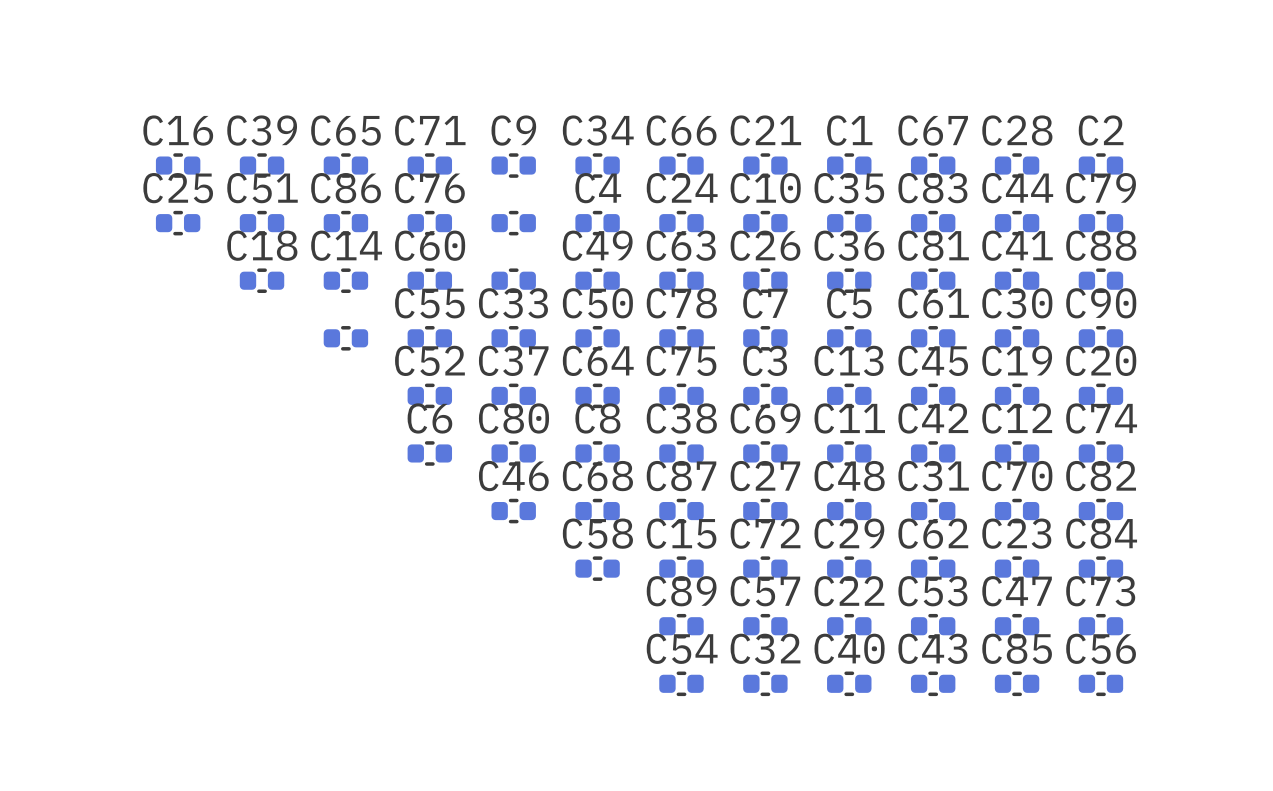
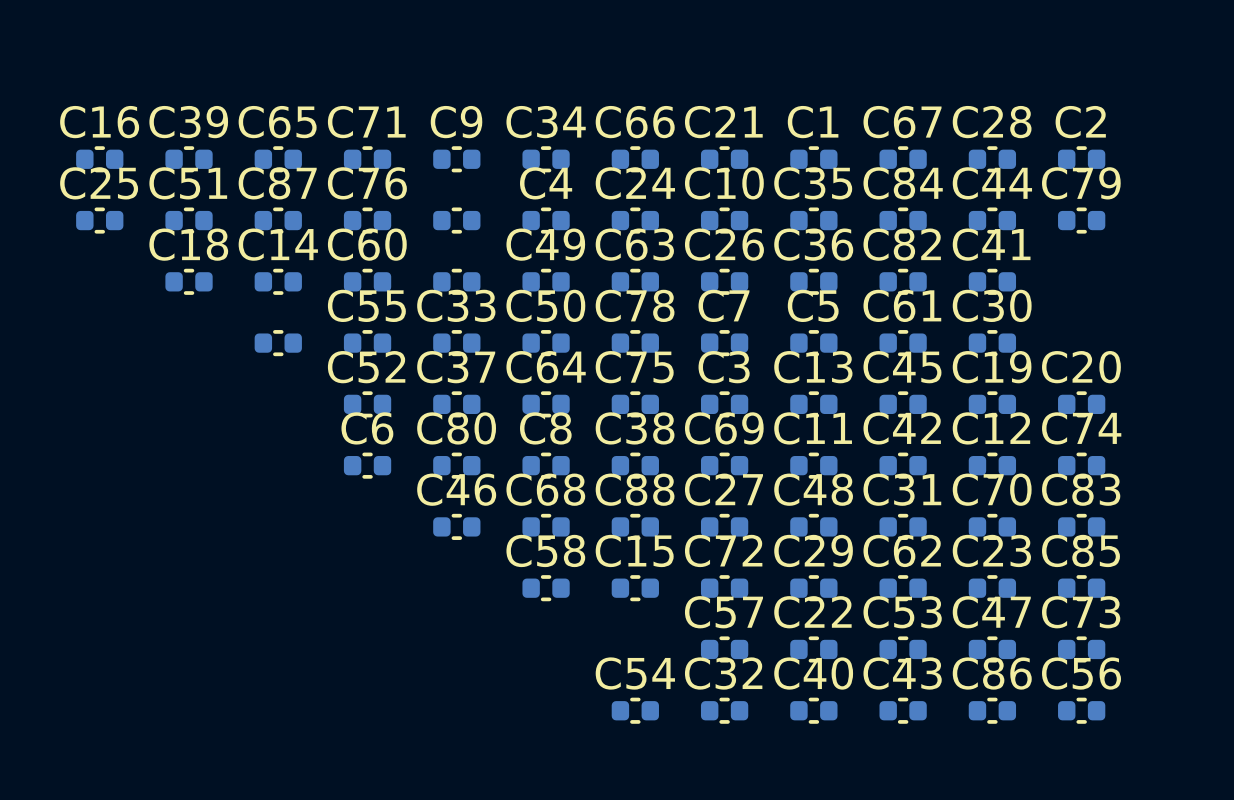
C86 name: C86 (346, 188) -> C87 (277, 183)
C83 name: C83 (932, 188) -> C84 (903, 183)
C81 name: C81 (933, 245) -> C82 (902, 244)
C88: (1100, 280) -> none
C90: (1100, 338) -> none
C87 name: C87 (681, 476) -> C88 (635, 489)
C82 name: C82 (1101, 476) -> C83 (1081, 489)
C84 name: C84 (1101, 533) -> C85 (1080, 550)
C89: (681, 626) -> none
C85 name: C85 (1017, 648) -> C86 (992, 673)

